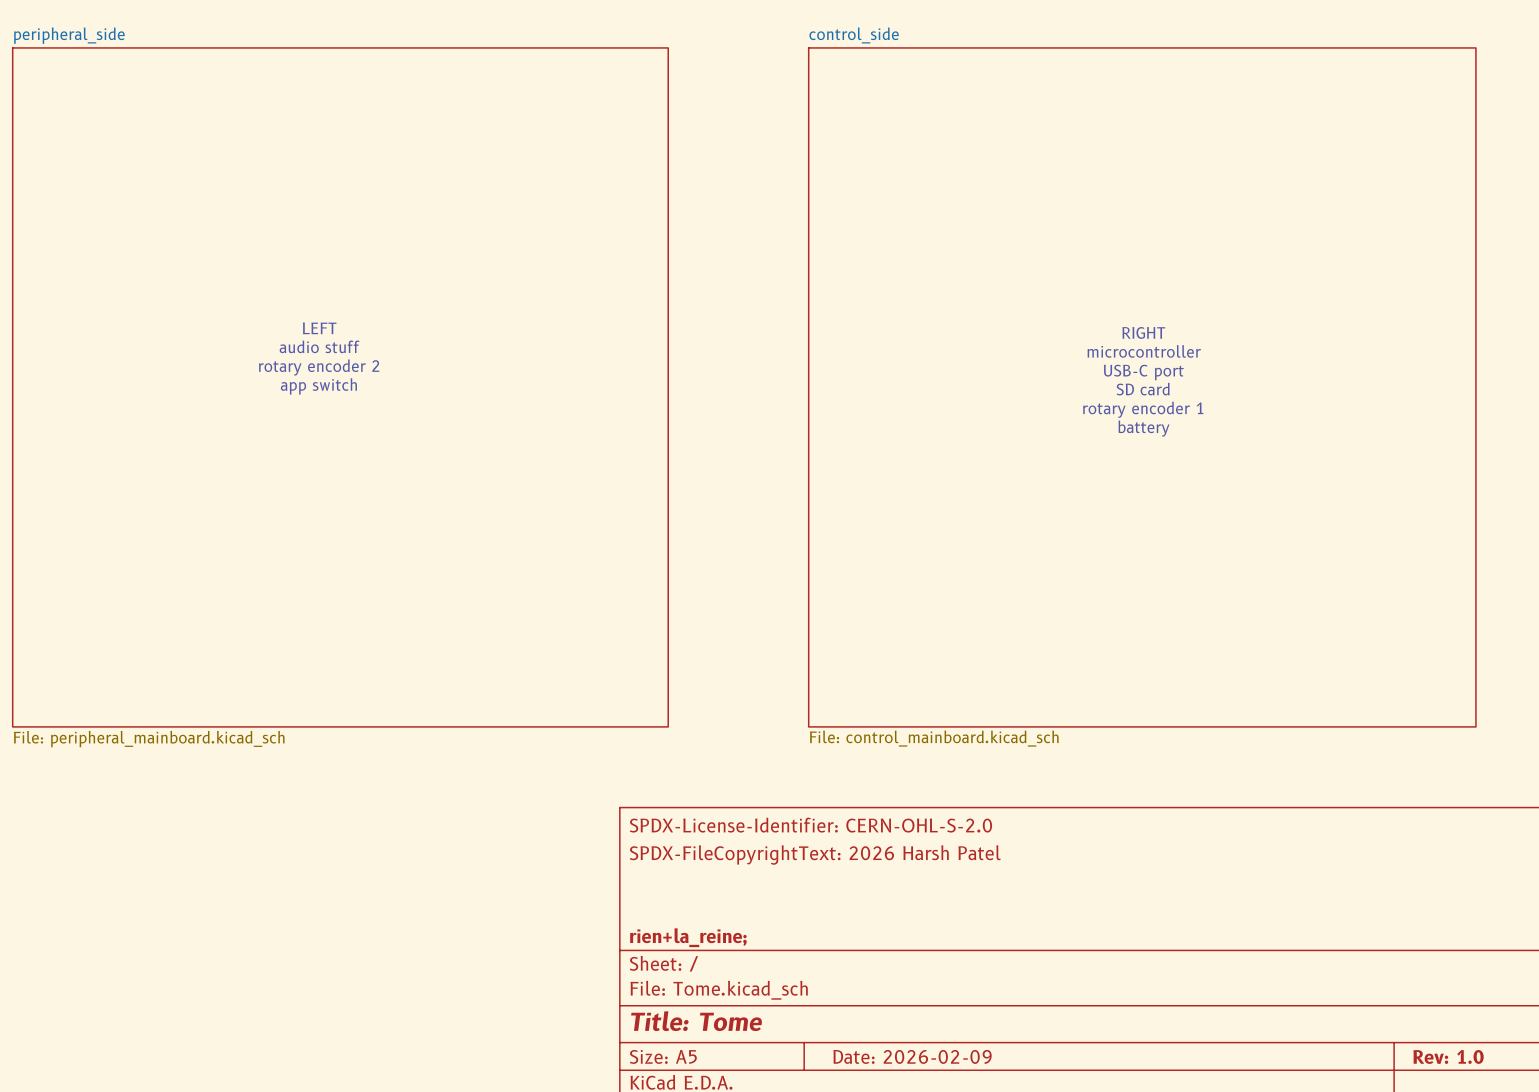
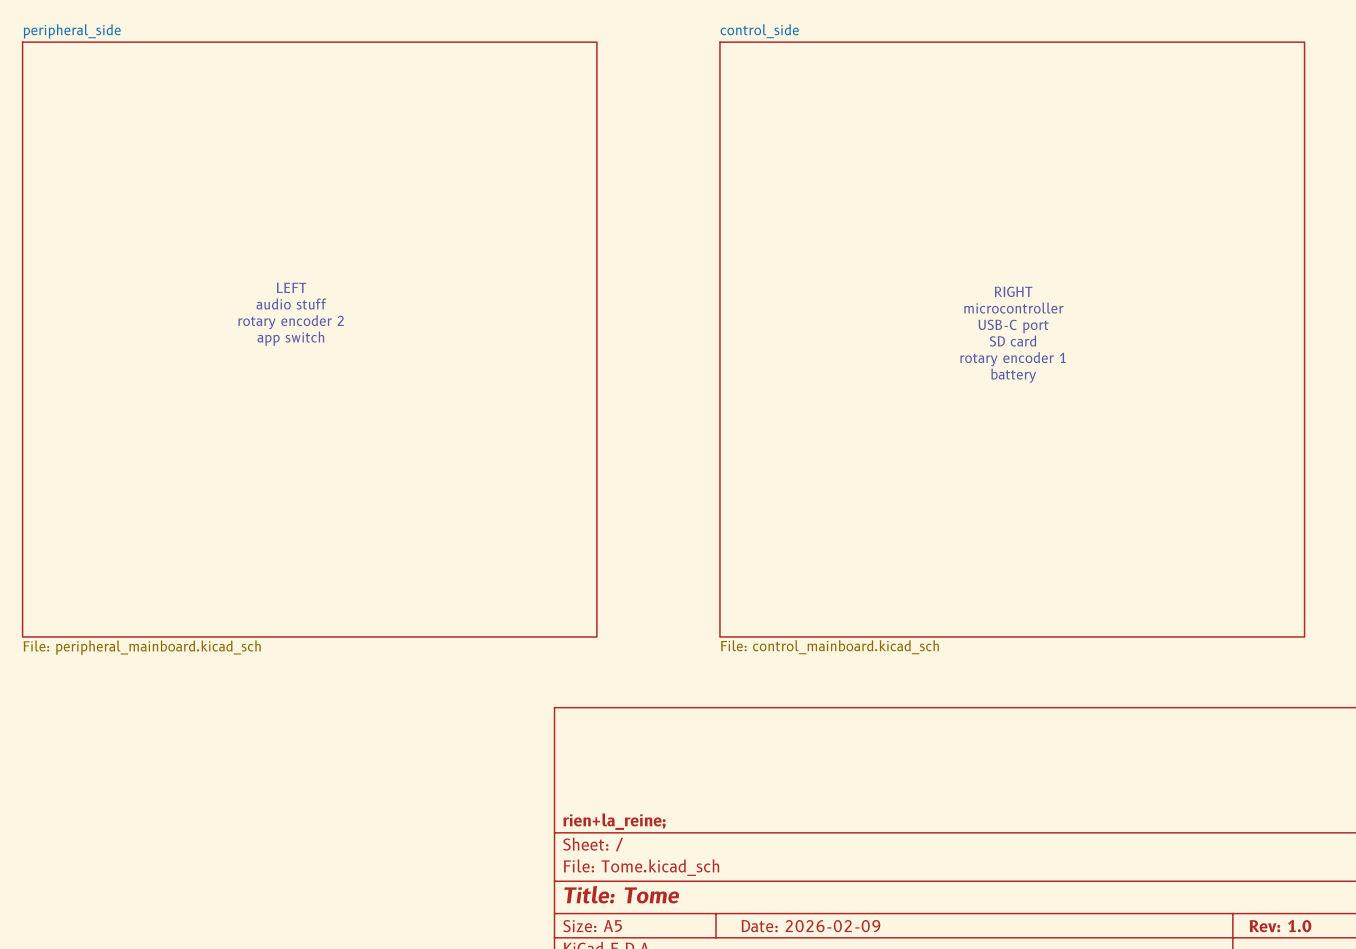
title block: SPDX-License-Identifier: CERN-OHL-S-2.0 (810, 825) -> none
title block: SPDX-FileCopyrightText: 2026 Harsh Patel (815, 855) -> none

